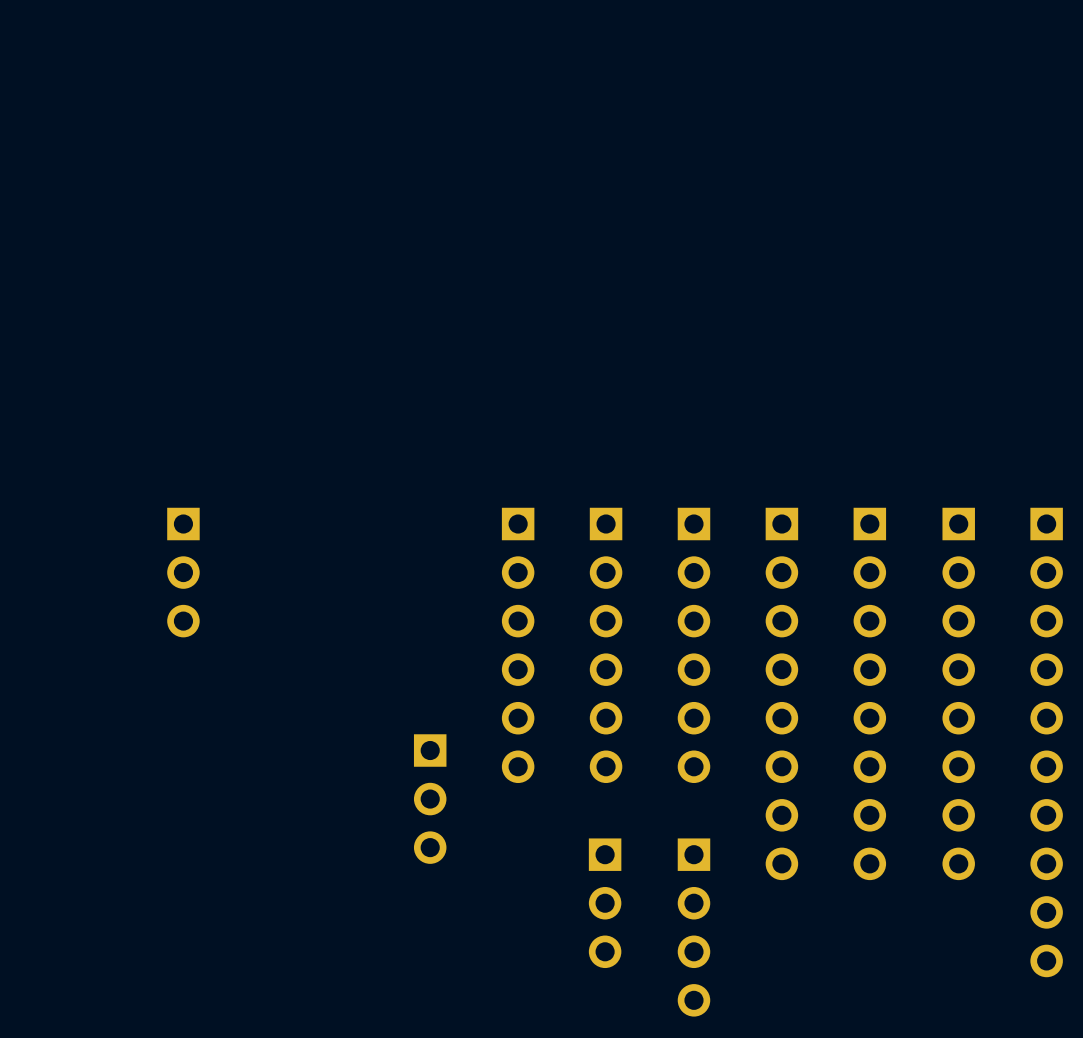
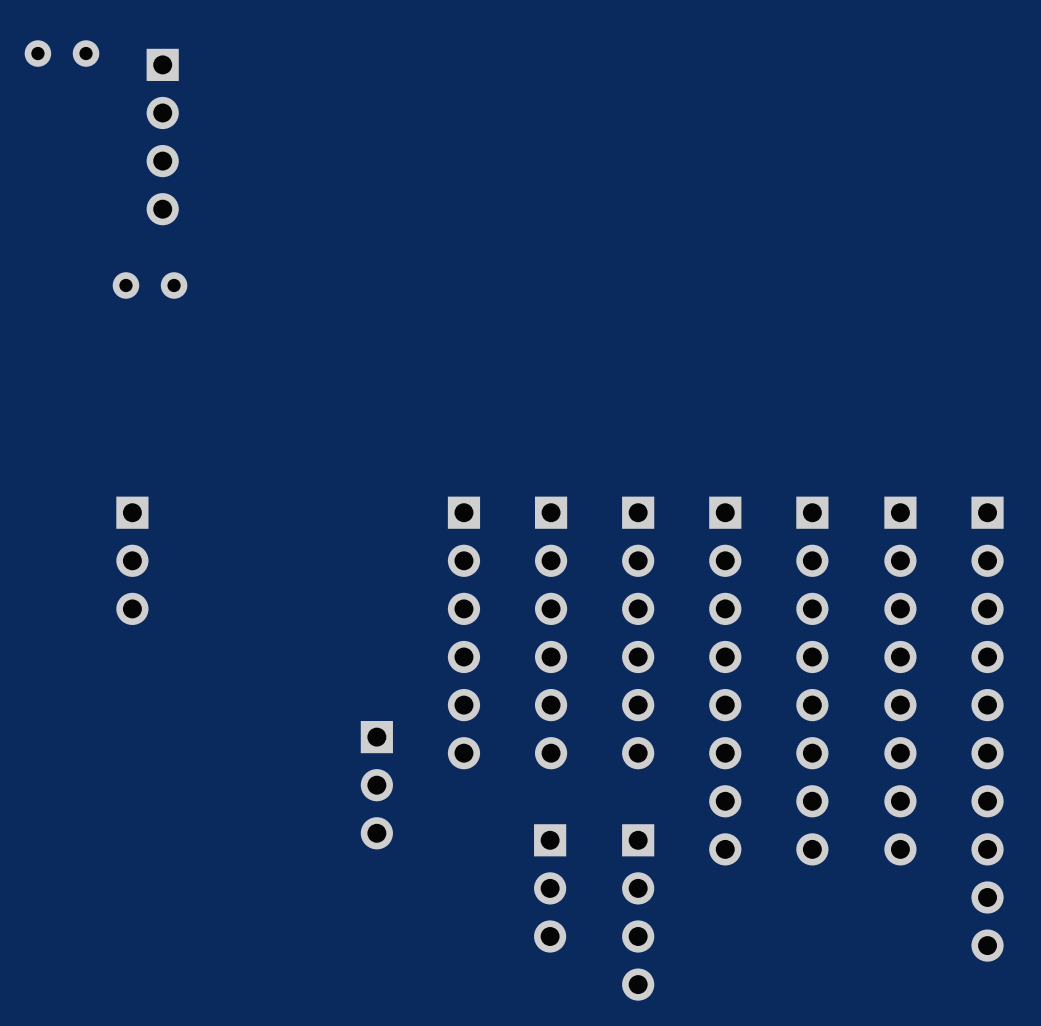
part: none -> (61, 53)
part: none -> (162, 137)
part: none -> (150, 285)

